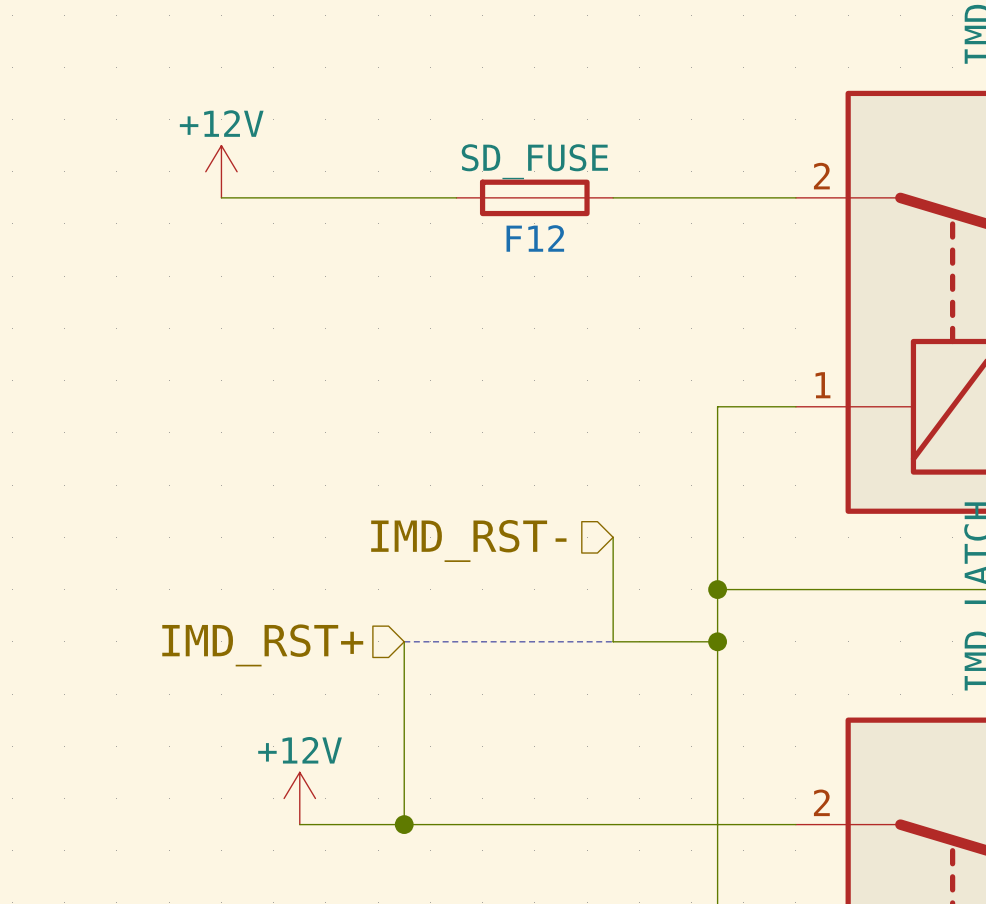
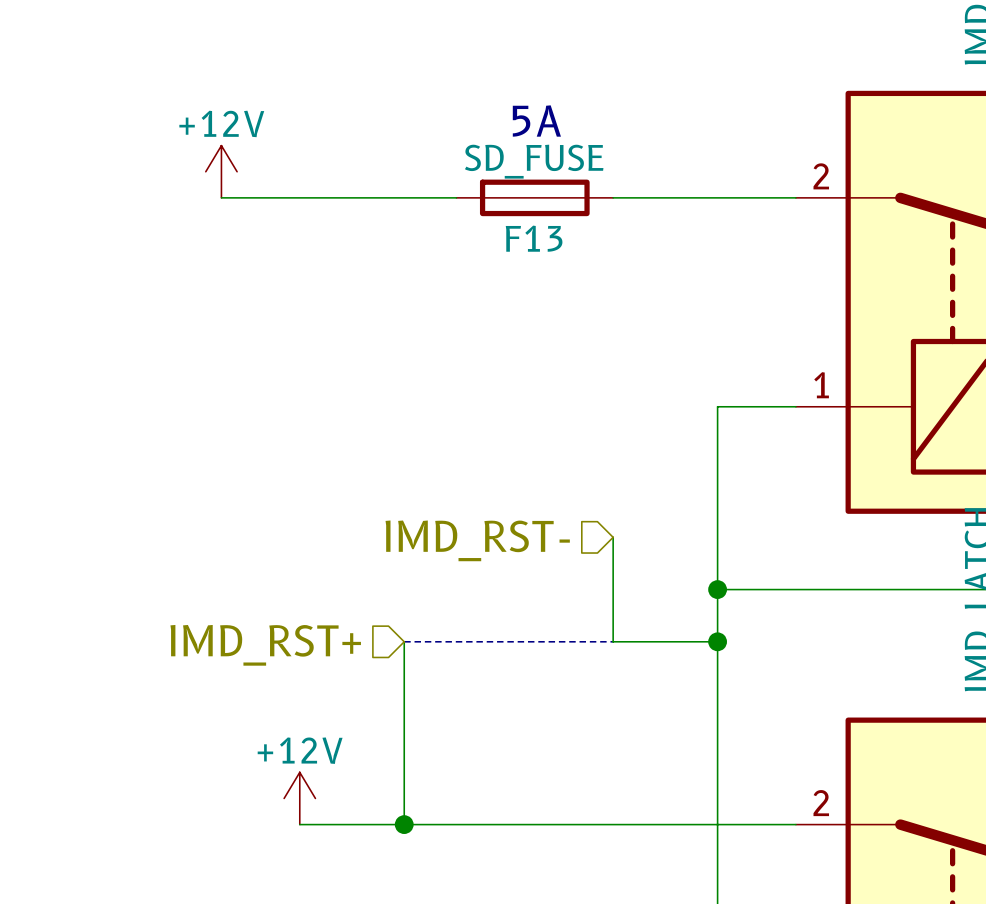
text: none -> 5A (536, 121)
F12 name: F12 (535, 238) -> F13 (534, 238)

